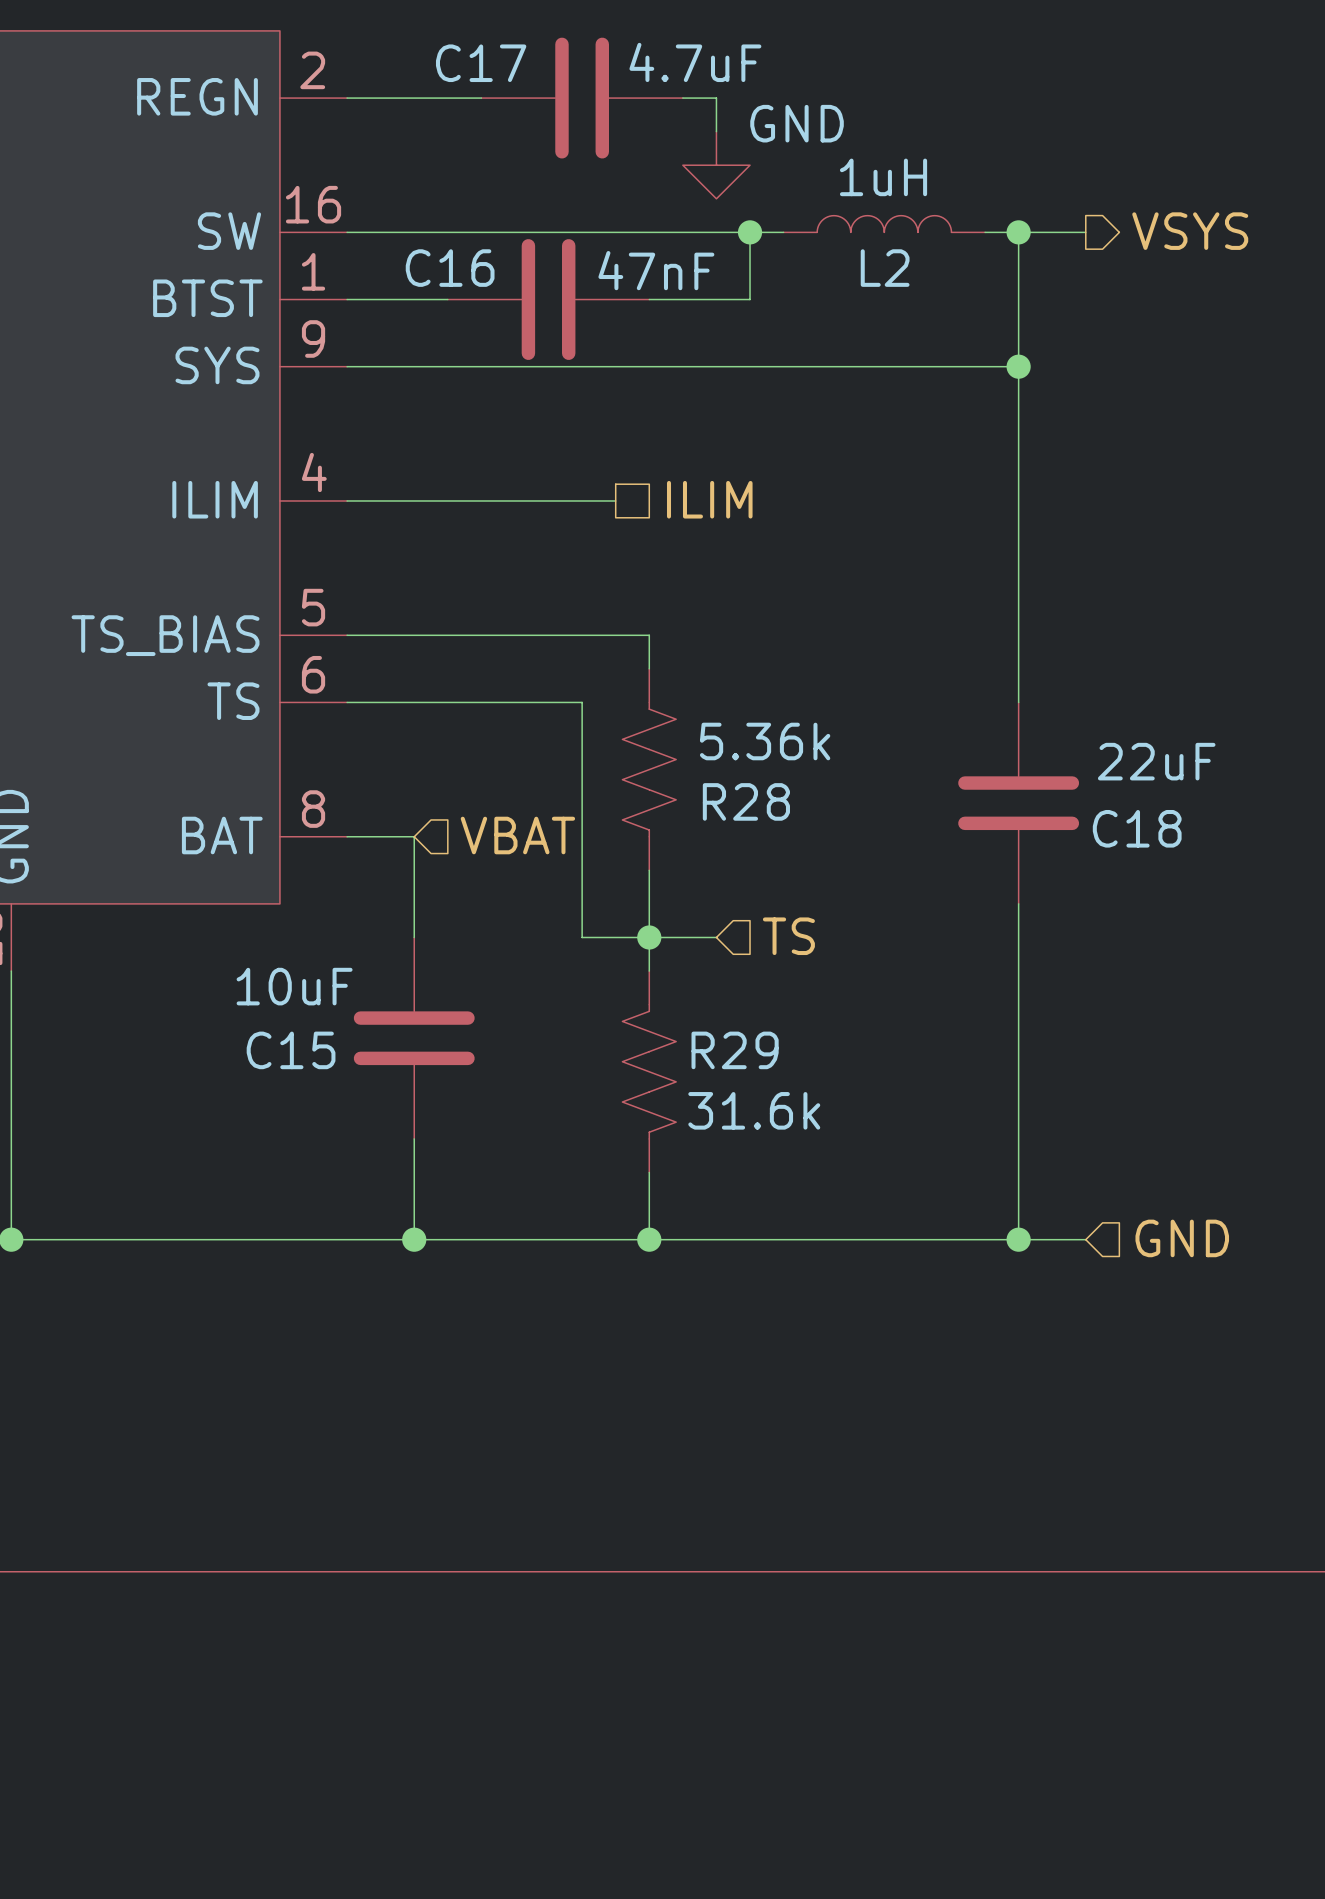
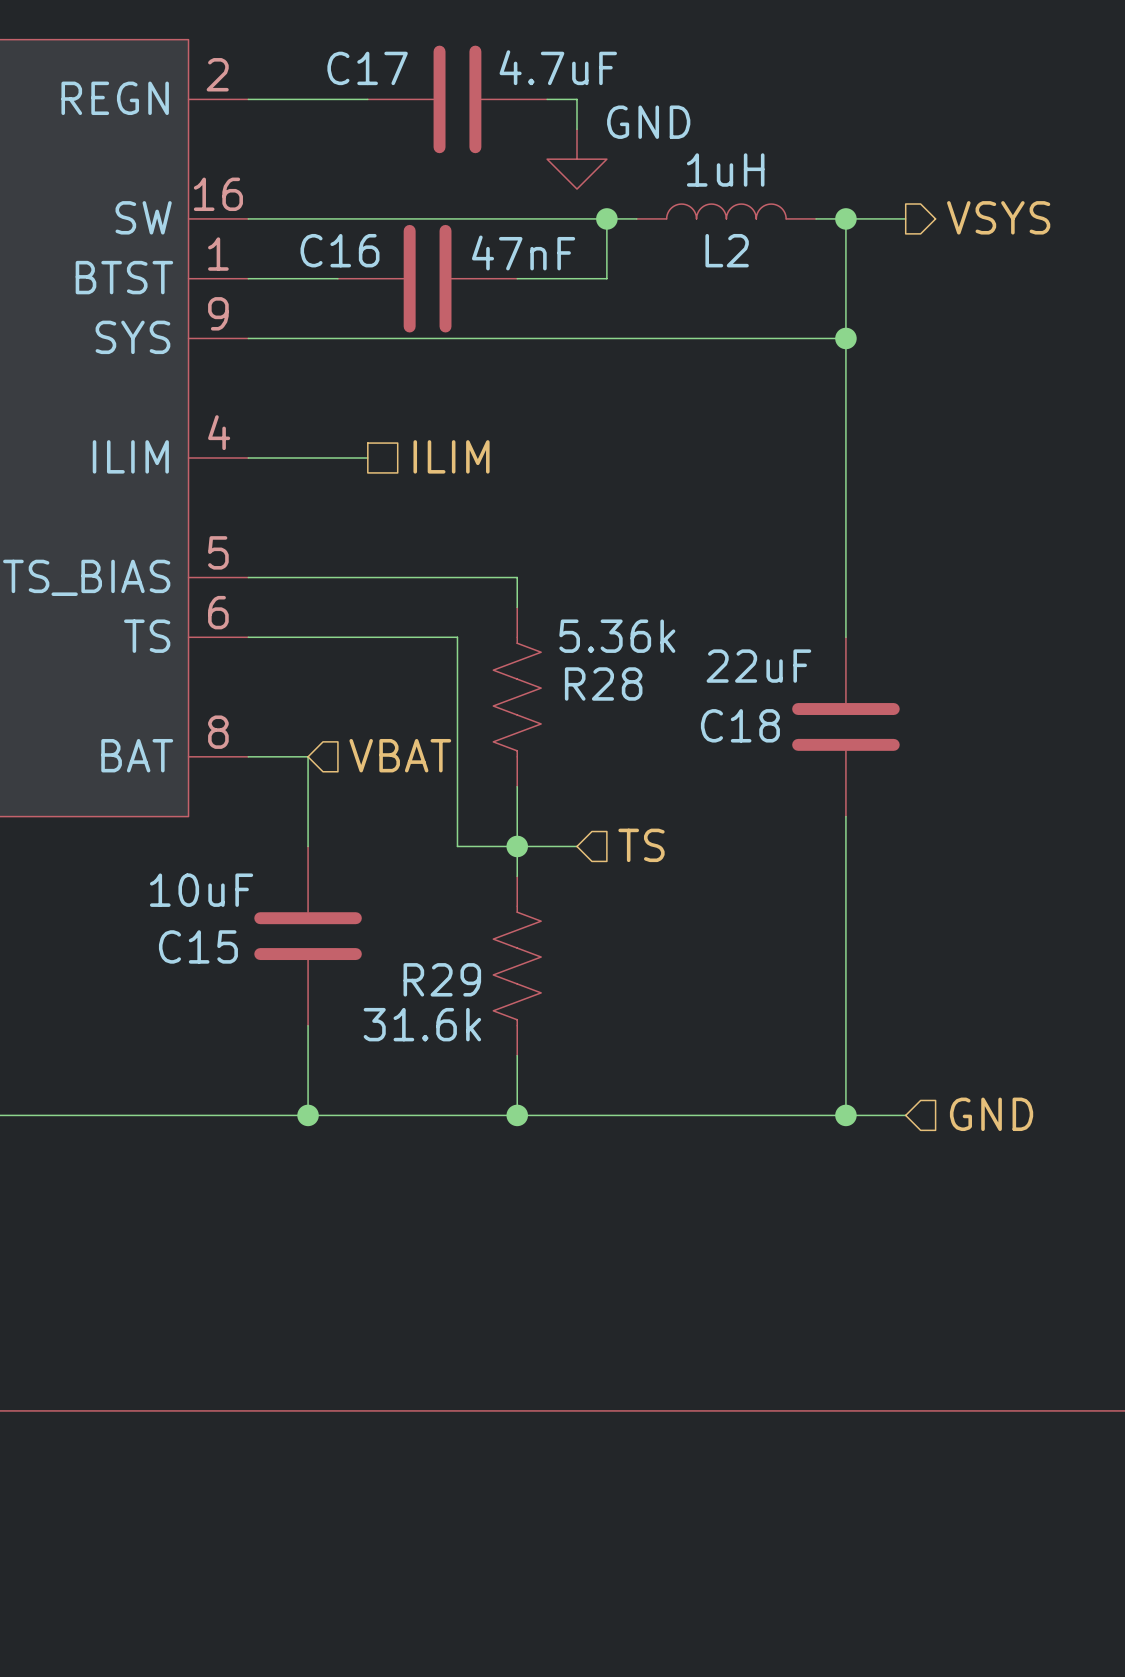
hierarchical label position: ILIM (709, 499) -> ILIM (451, 456)
wire: (481, 500) (615, 500) -> none
R28 value position: 5.36k (765, 741) -> 5.36k (617, 636)
C18 value position: 22uF (1156, 761) -> 22uF (758, 666)
R28 name position: R28 (746, 801) -> R28 (603, 683)
C18 name position: C18 (1137, 828) -> C18 (740, 725)
R29 flip: as is (649, 1071) -> left-right (517, 966)

